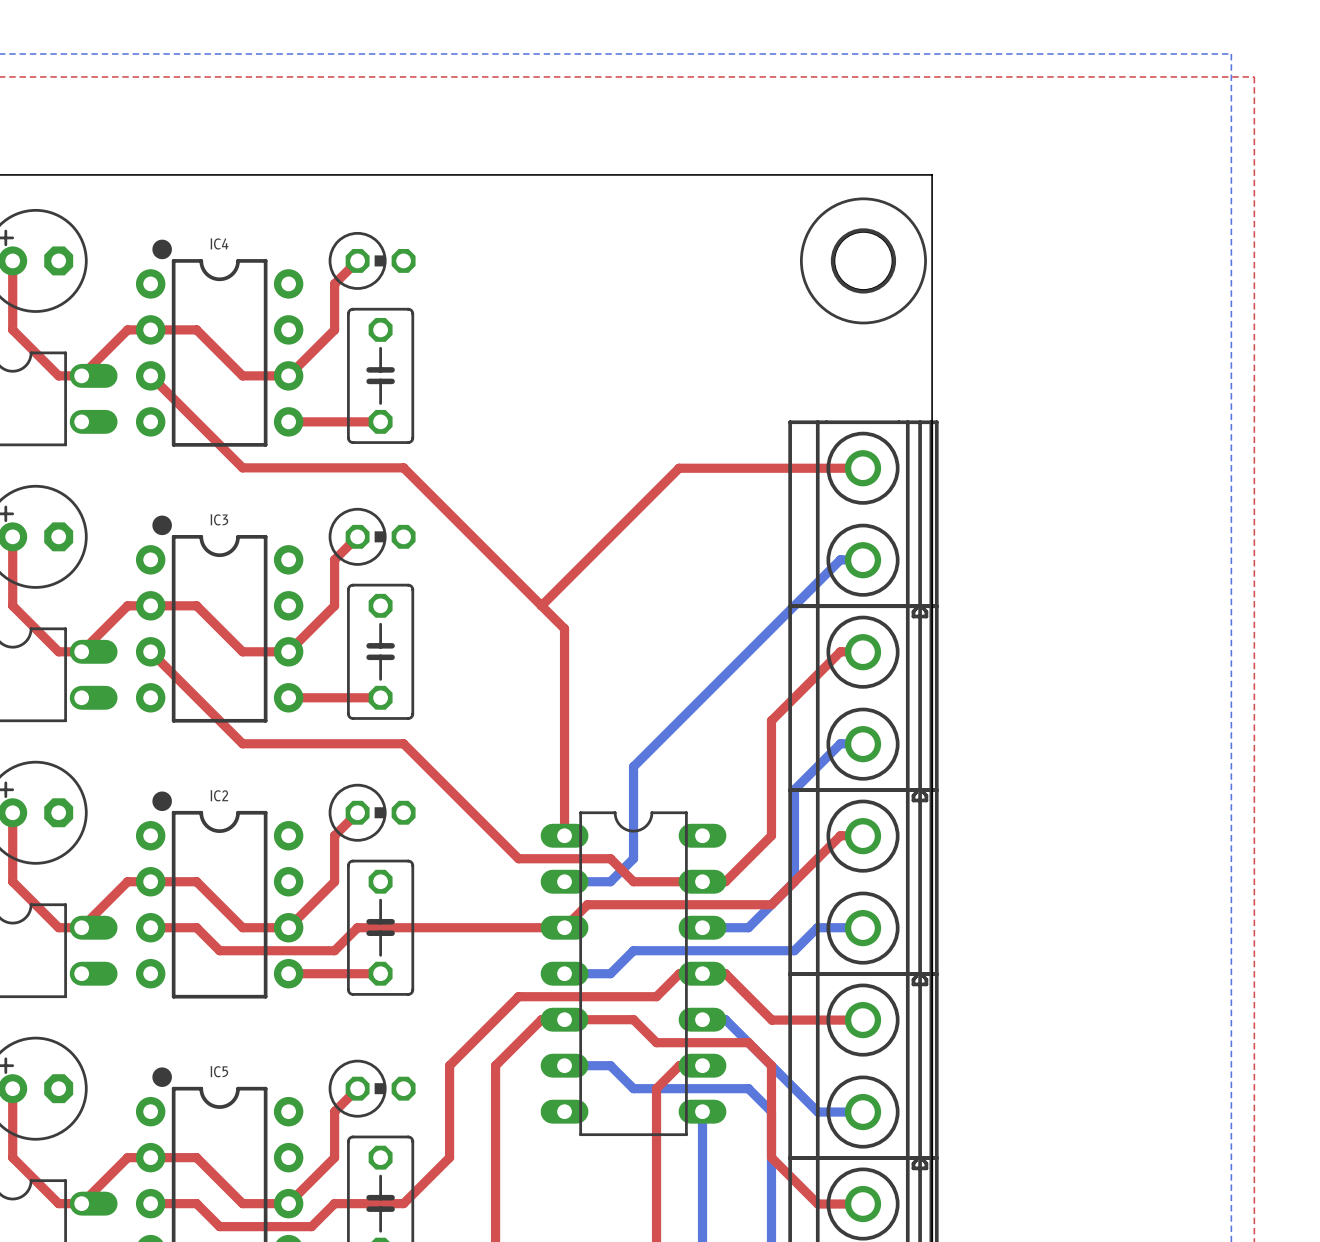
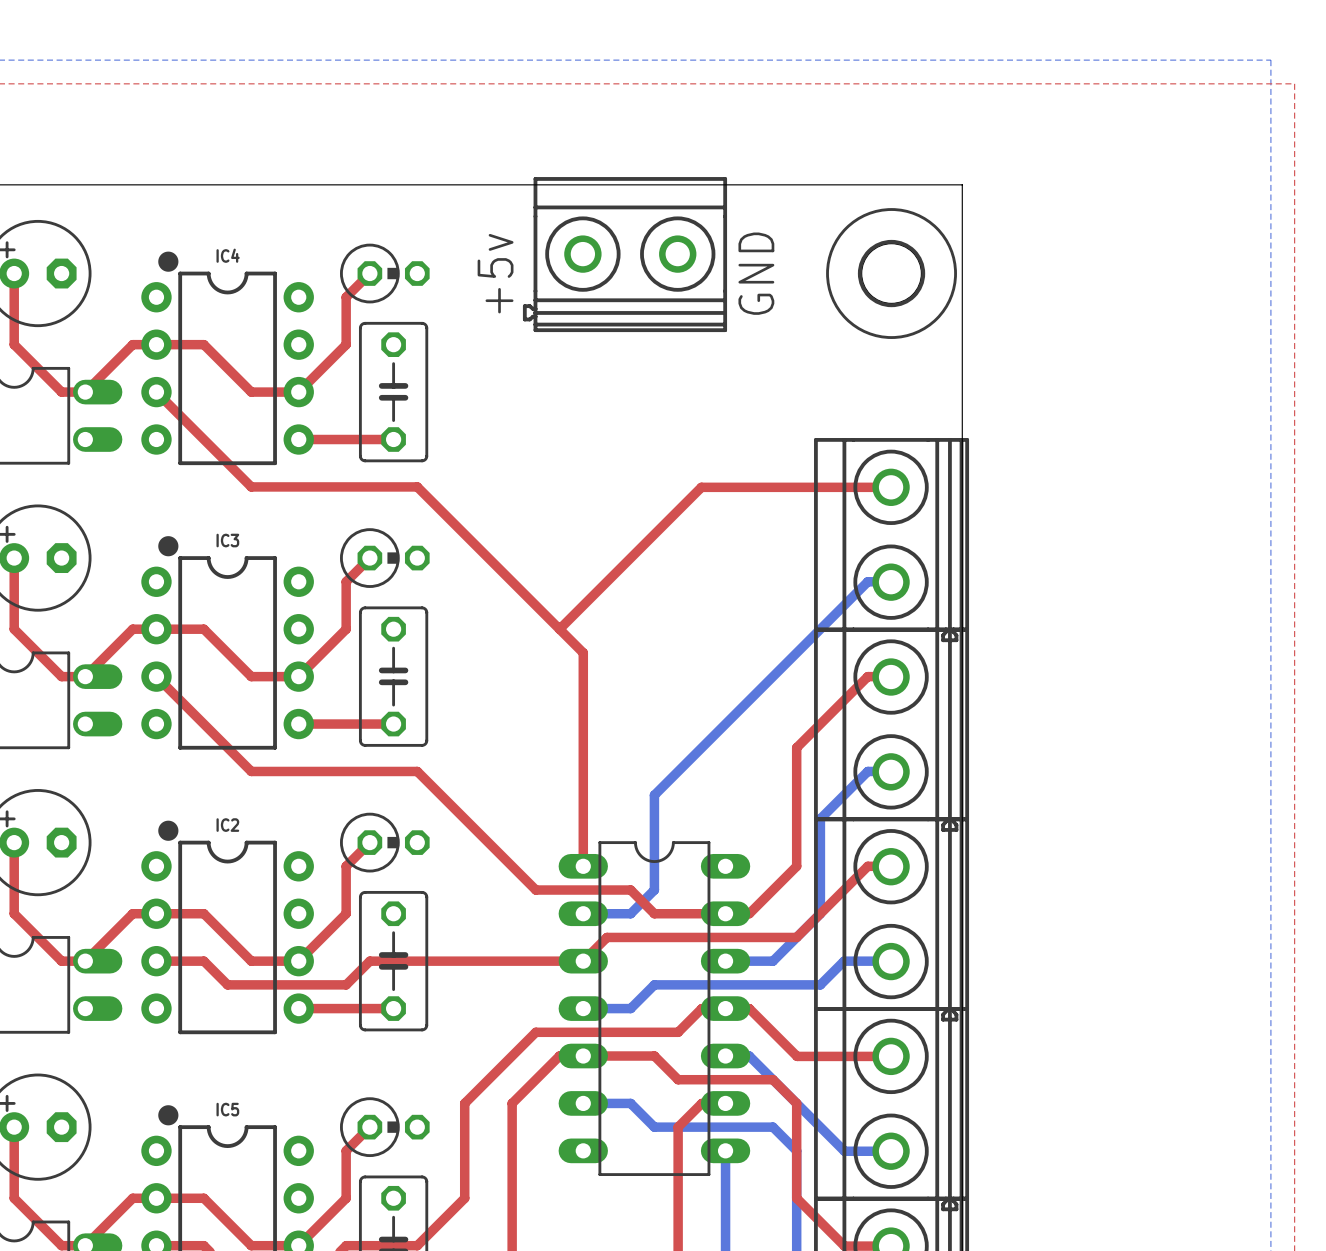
part: none -> (624, 254)
text: none -> GND (756, 273)
text: none -> +5v (495, 273)

